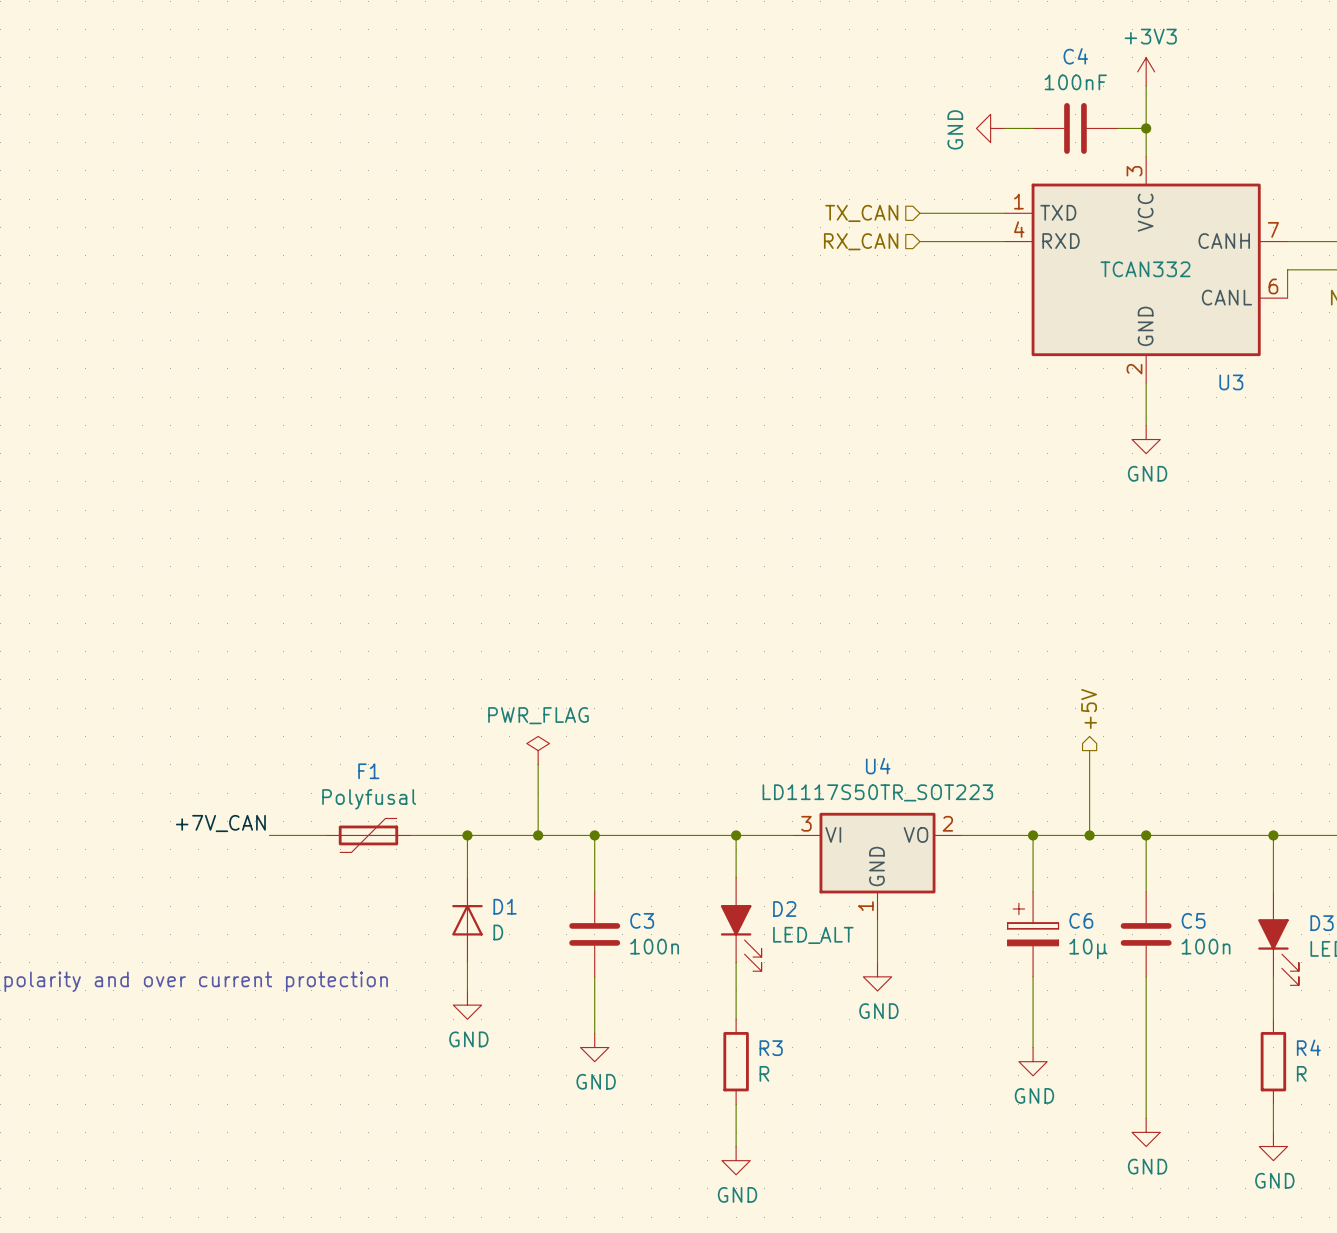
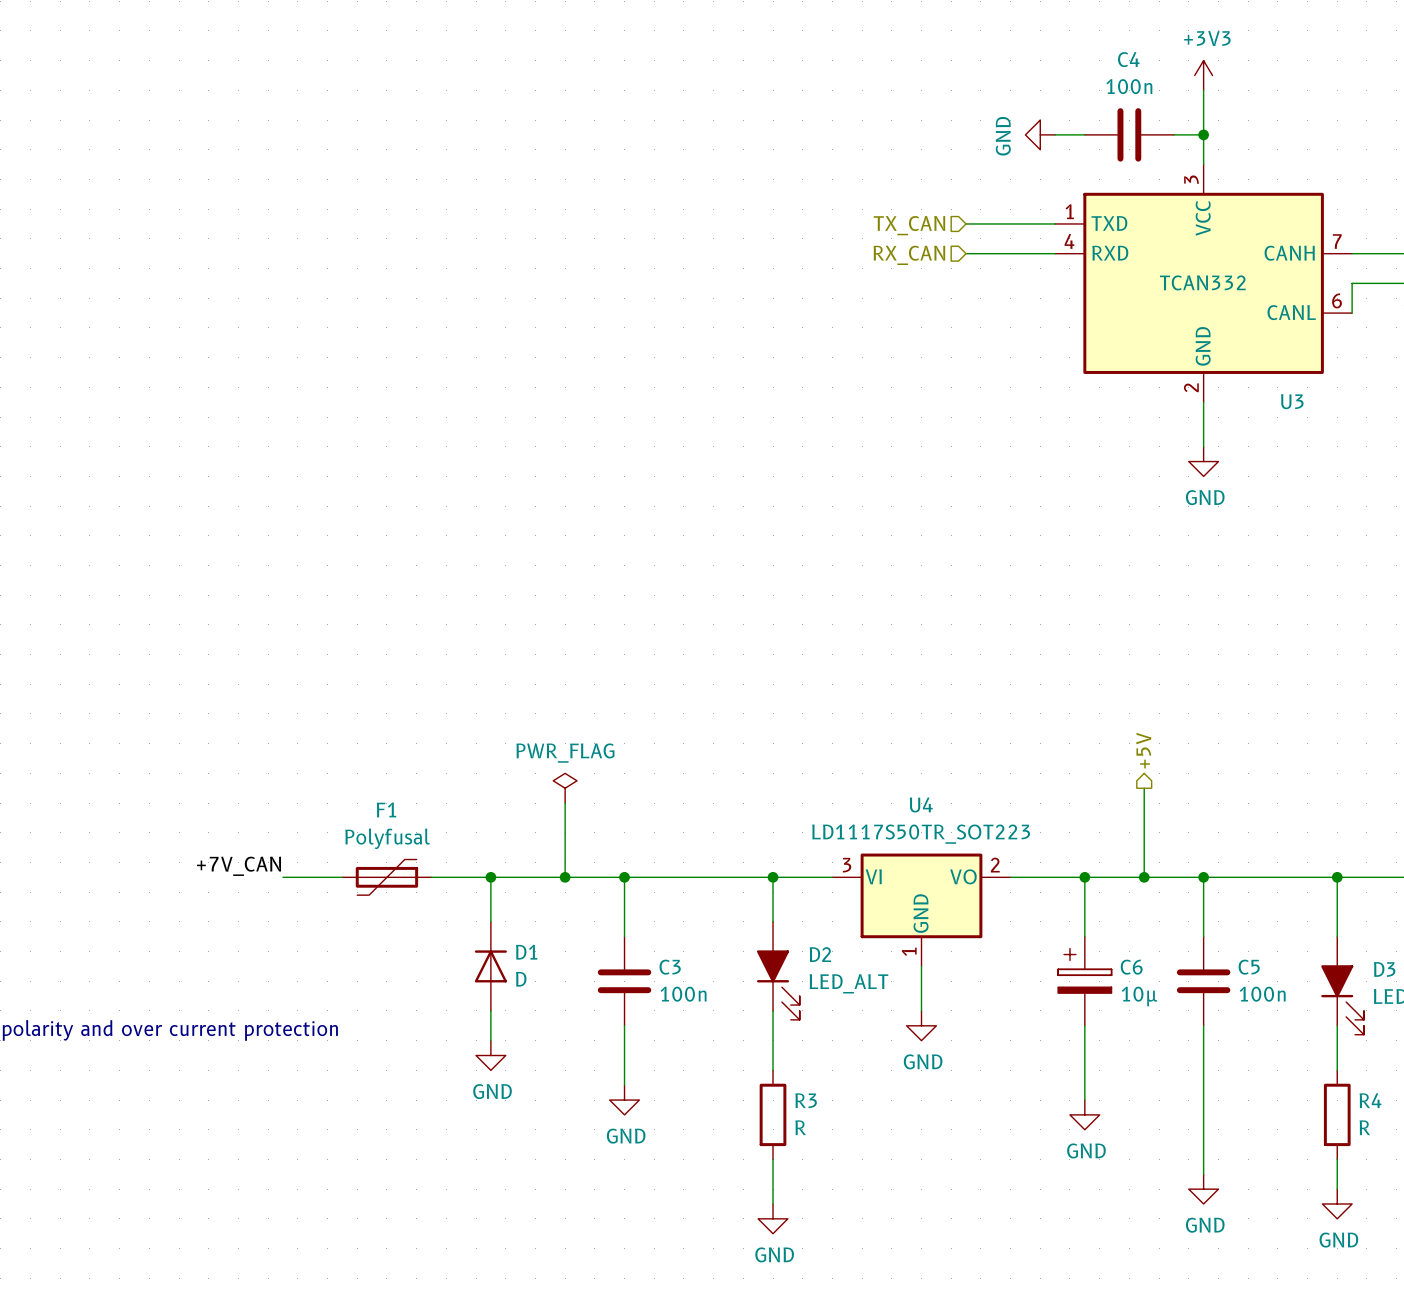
C4 value: 100nF (1075, 82) -> 100n (1129, 86)

